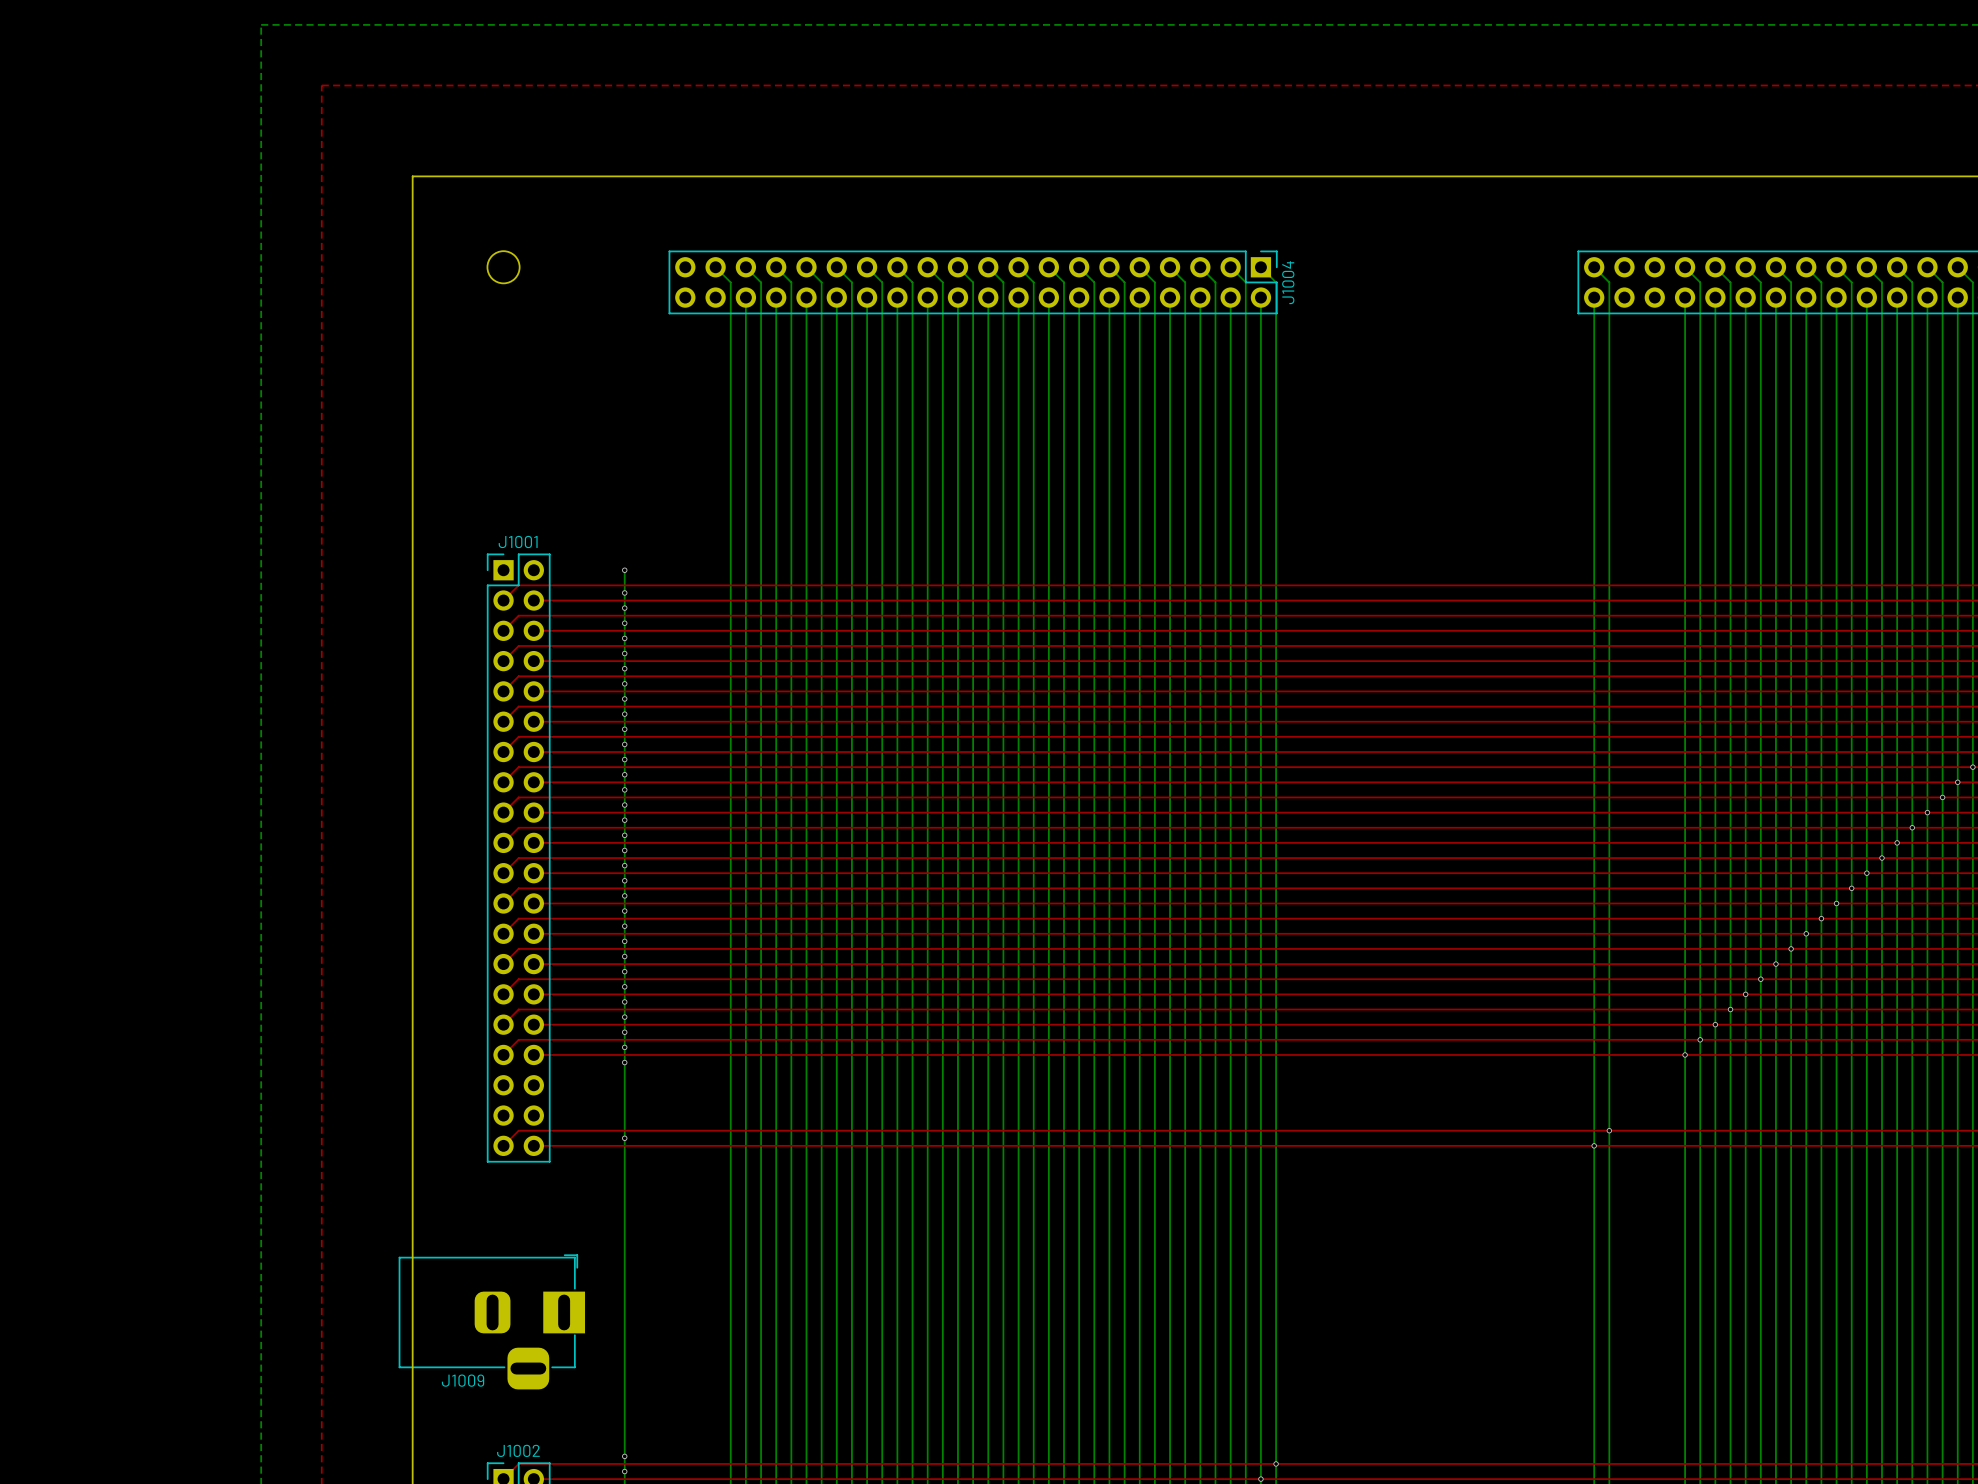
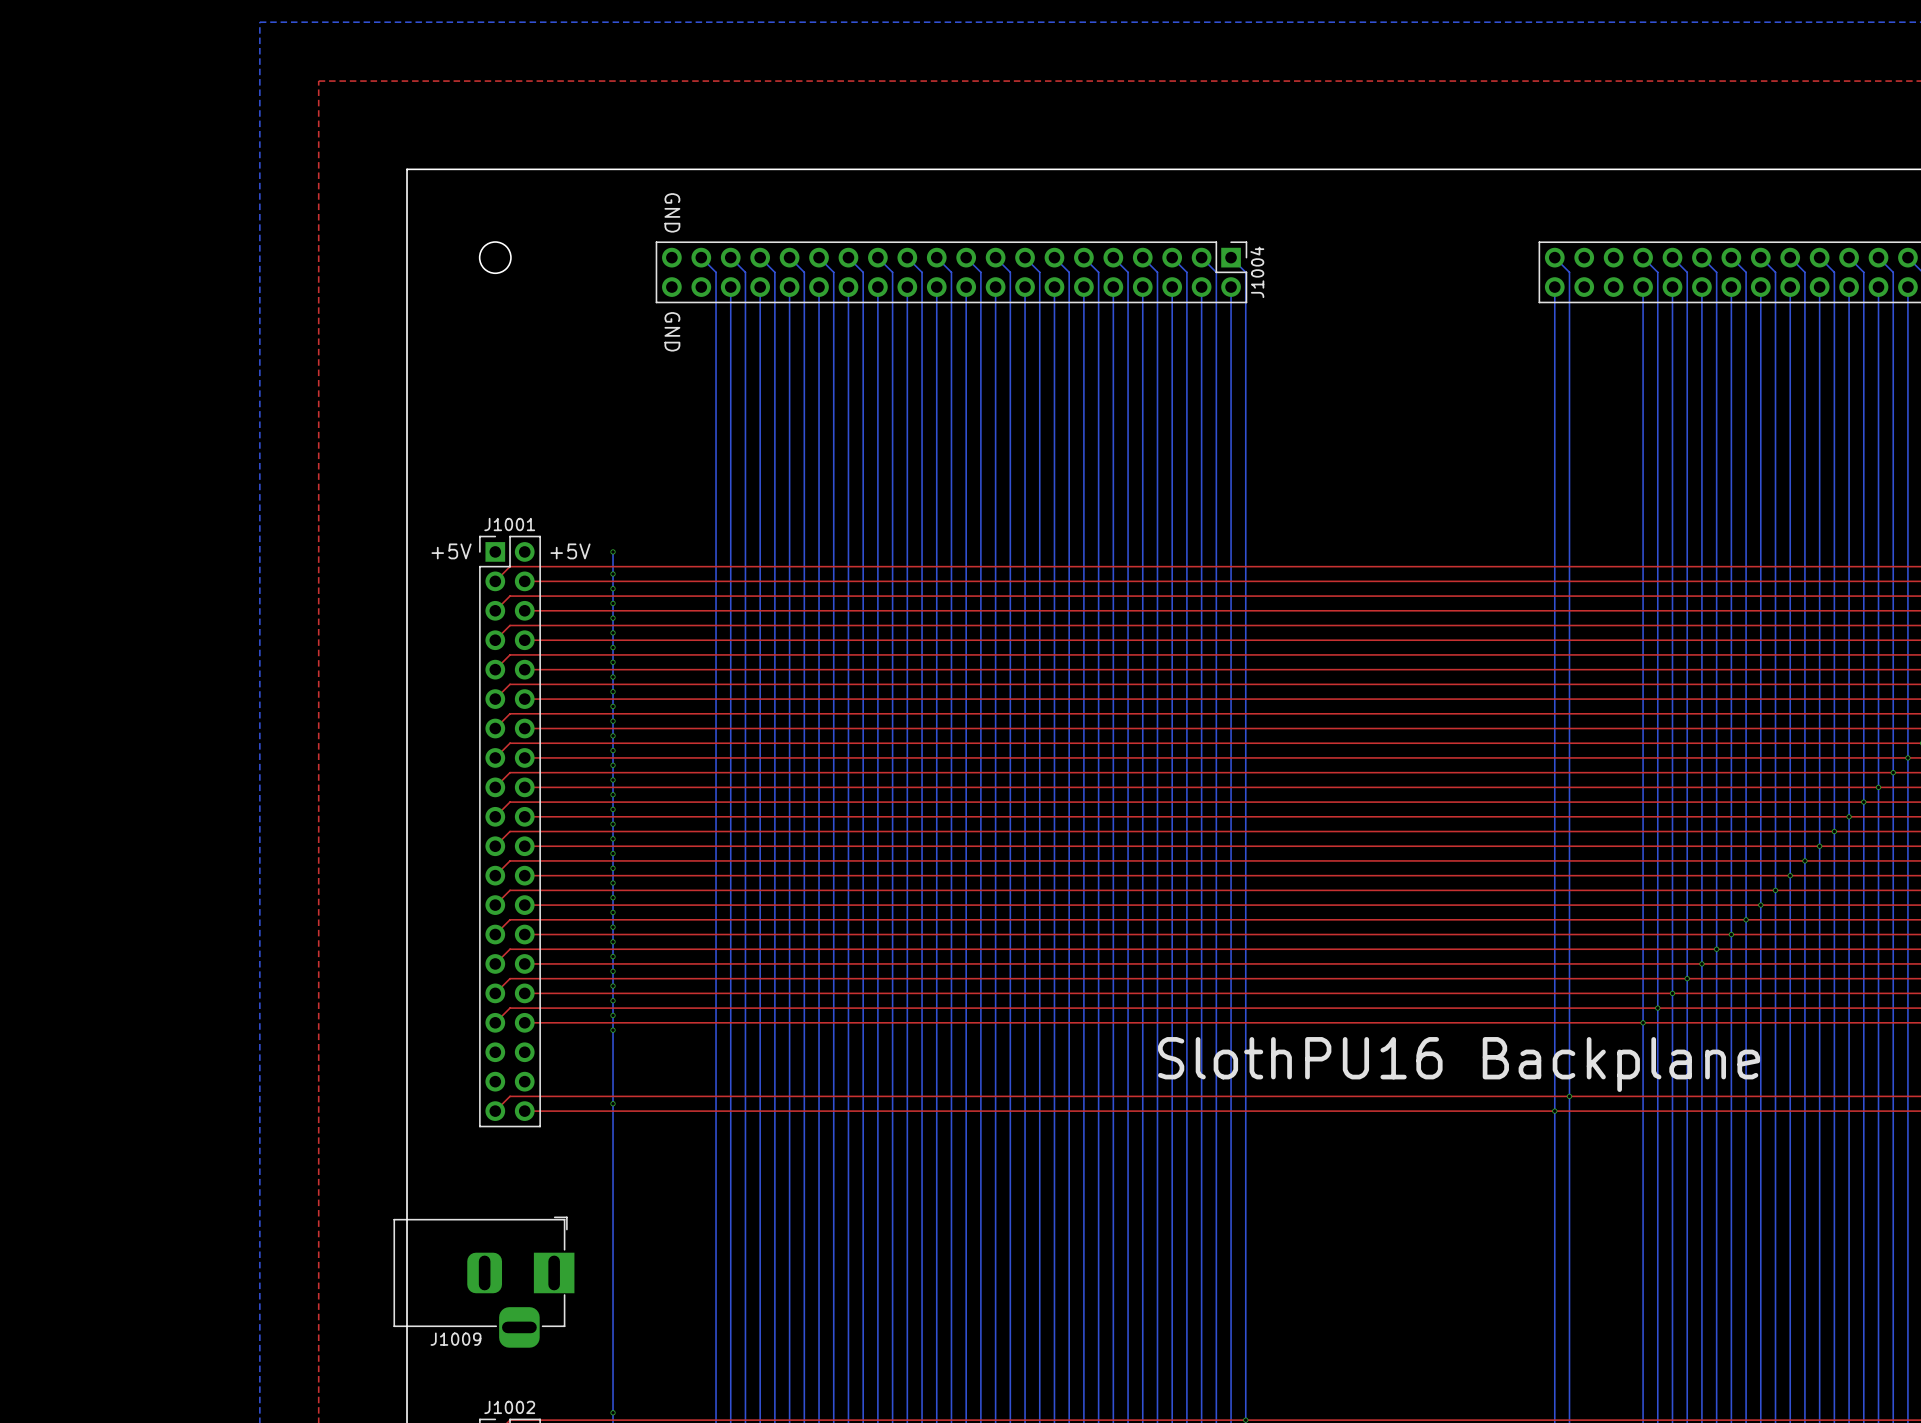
text: none -> GND (672, 212)
text: none -> GND (672, 331)
text: none -> +5V (451, 551)
text: none -> +5V (570, 551)
text: none -> SlothPU16 Backplane (1459, 1064)

